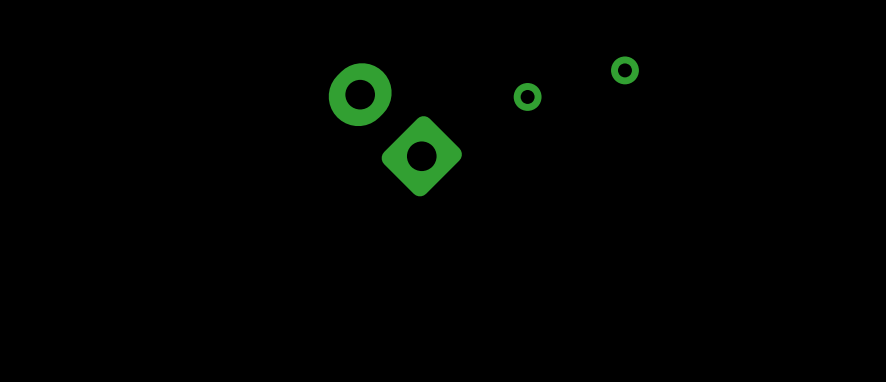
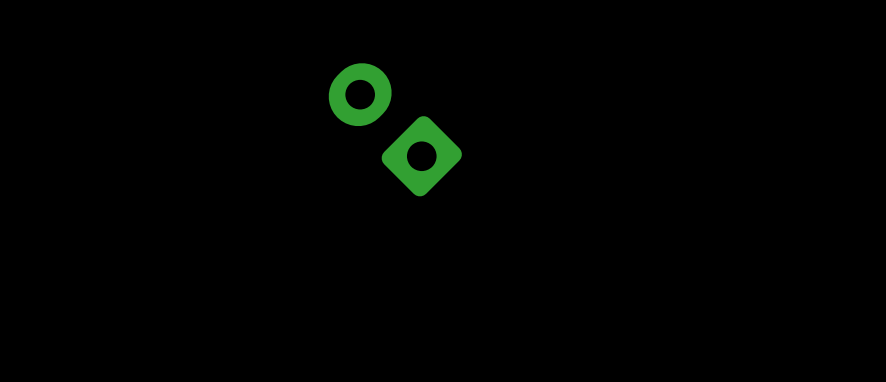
via: (624, 70) -> none
via: (527, 96) -> none

